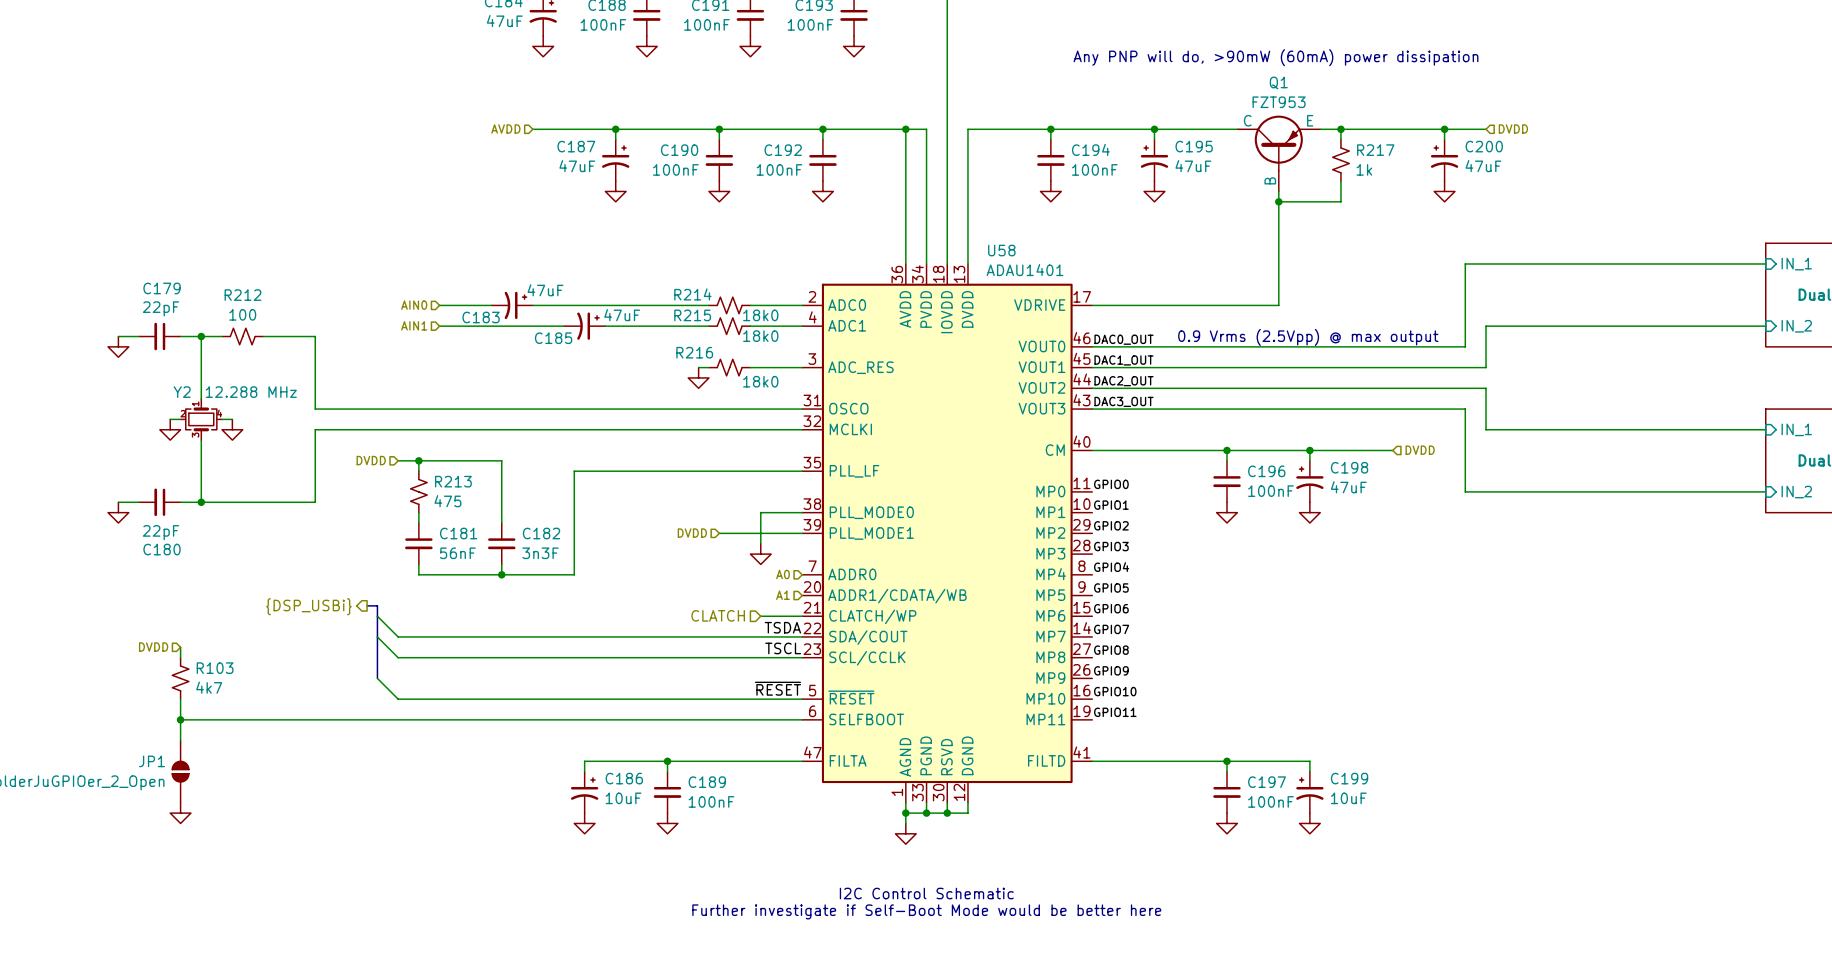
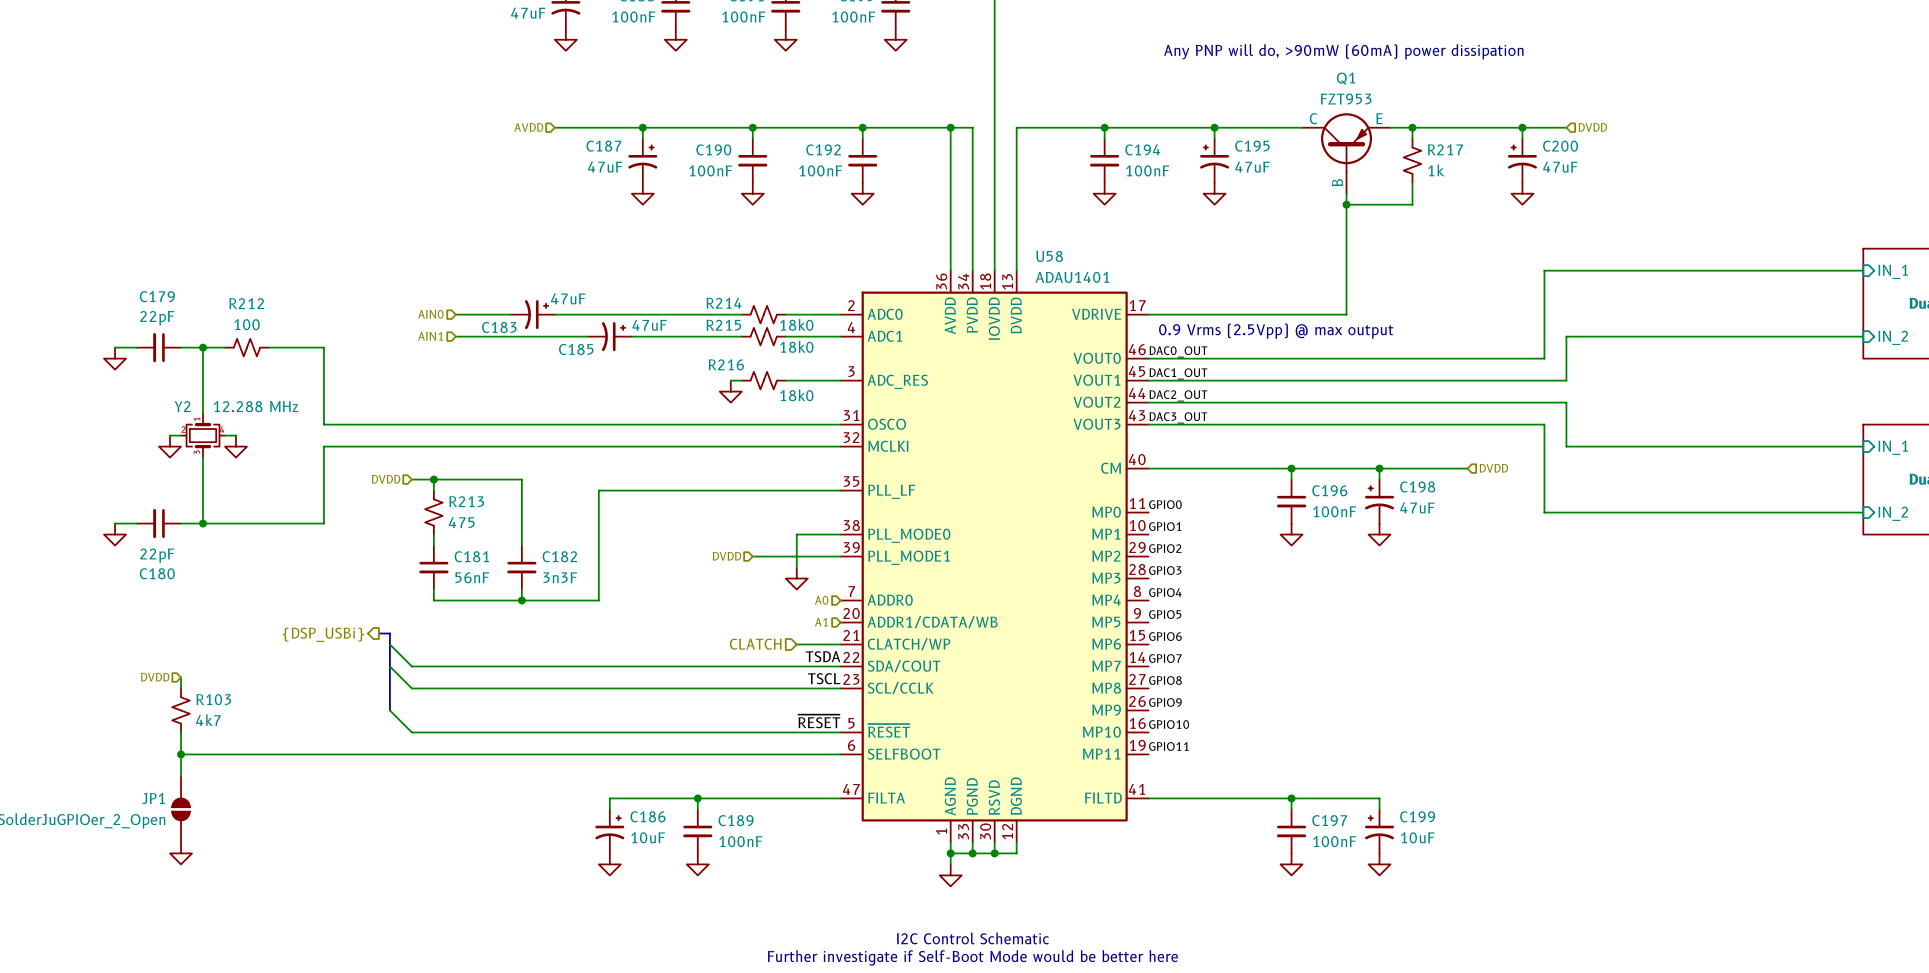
text position: 0.9 Vrms (2.5Vpp) @ max output (1308, 337) -> 0.9 Vrms (2.5Vpp) @ max output (1276, 331)

